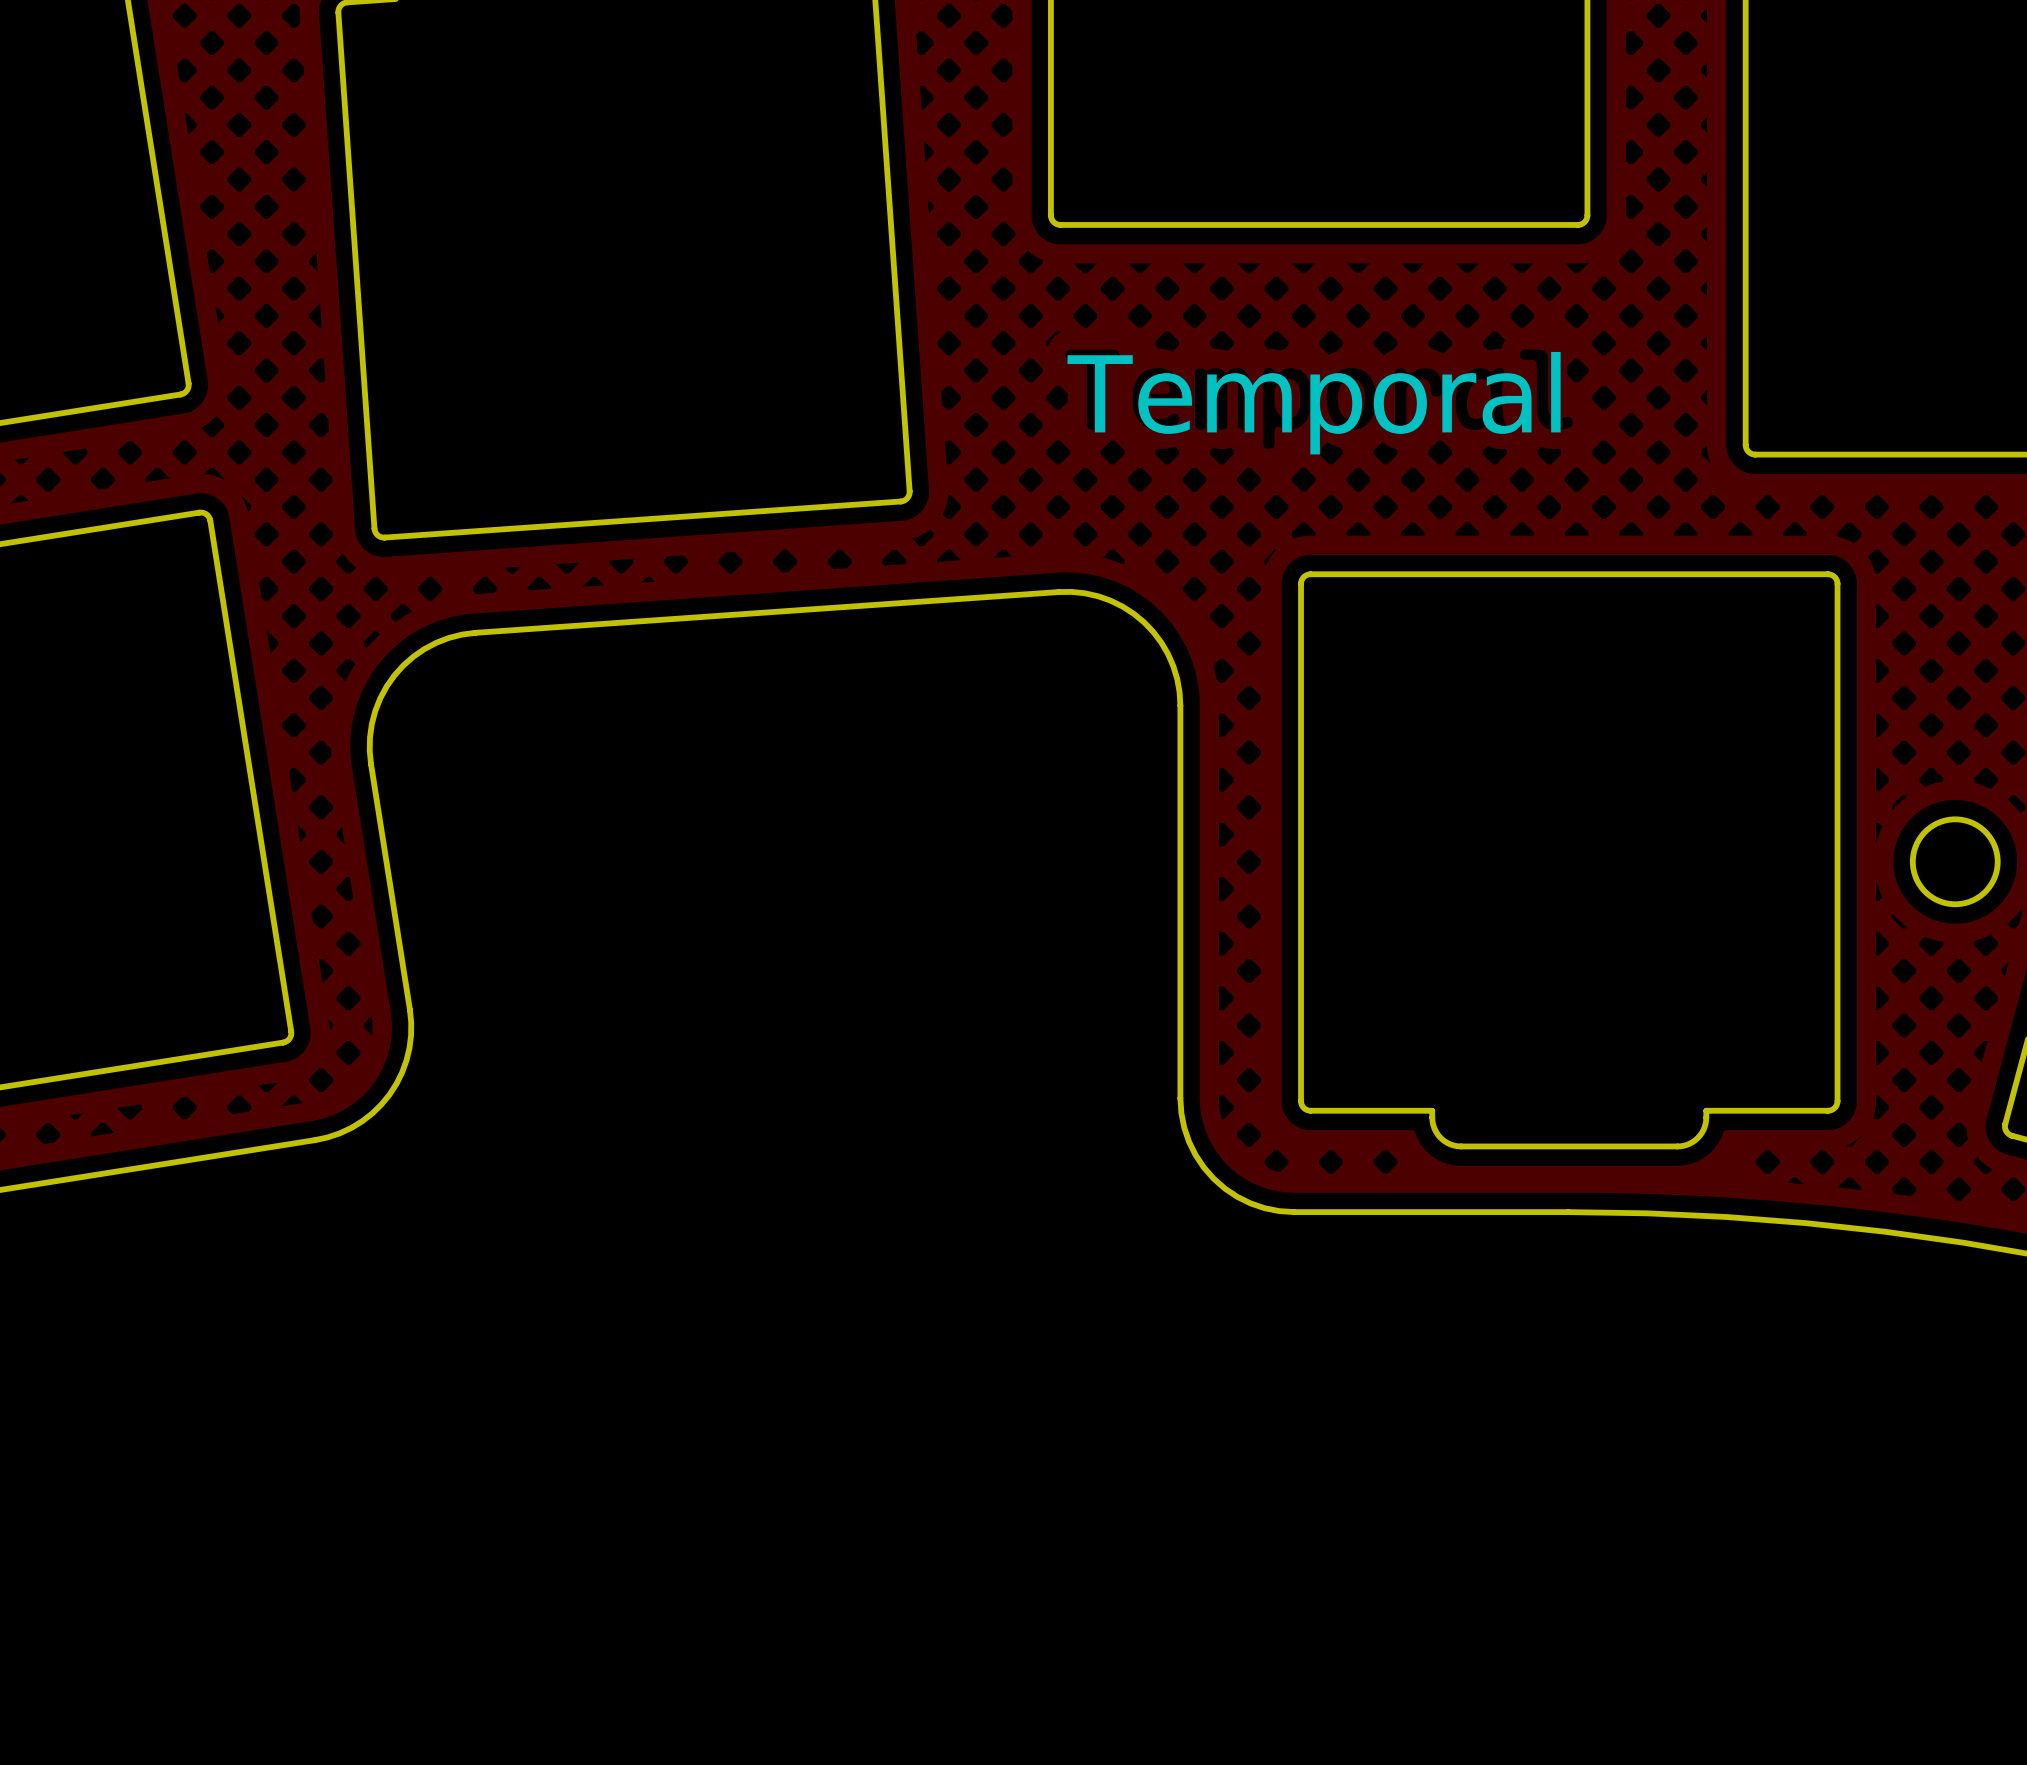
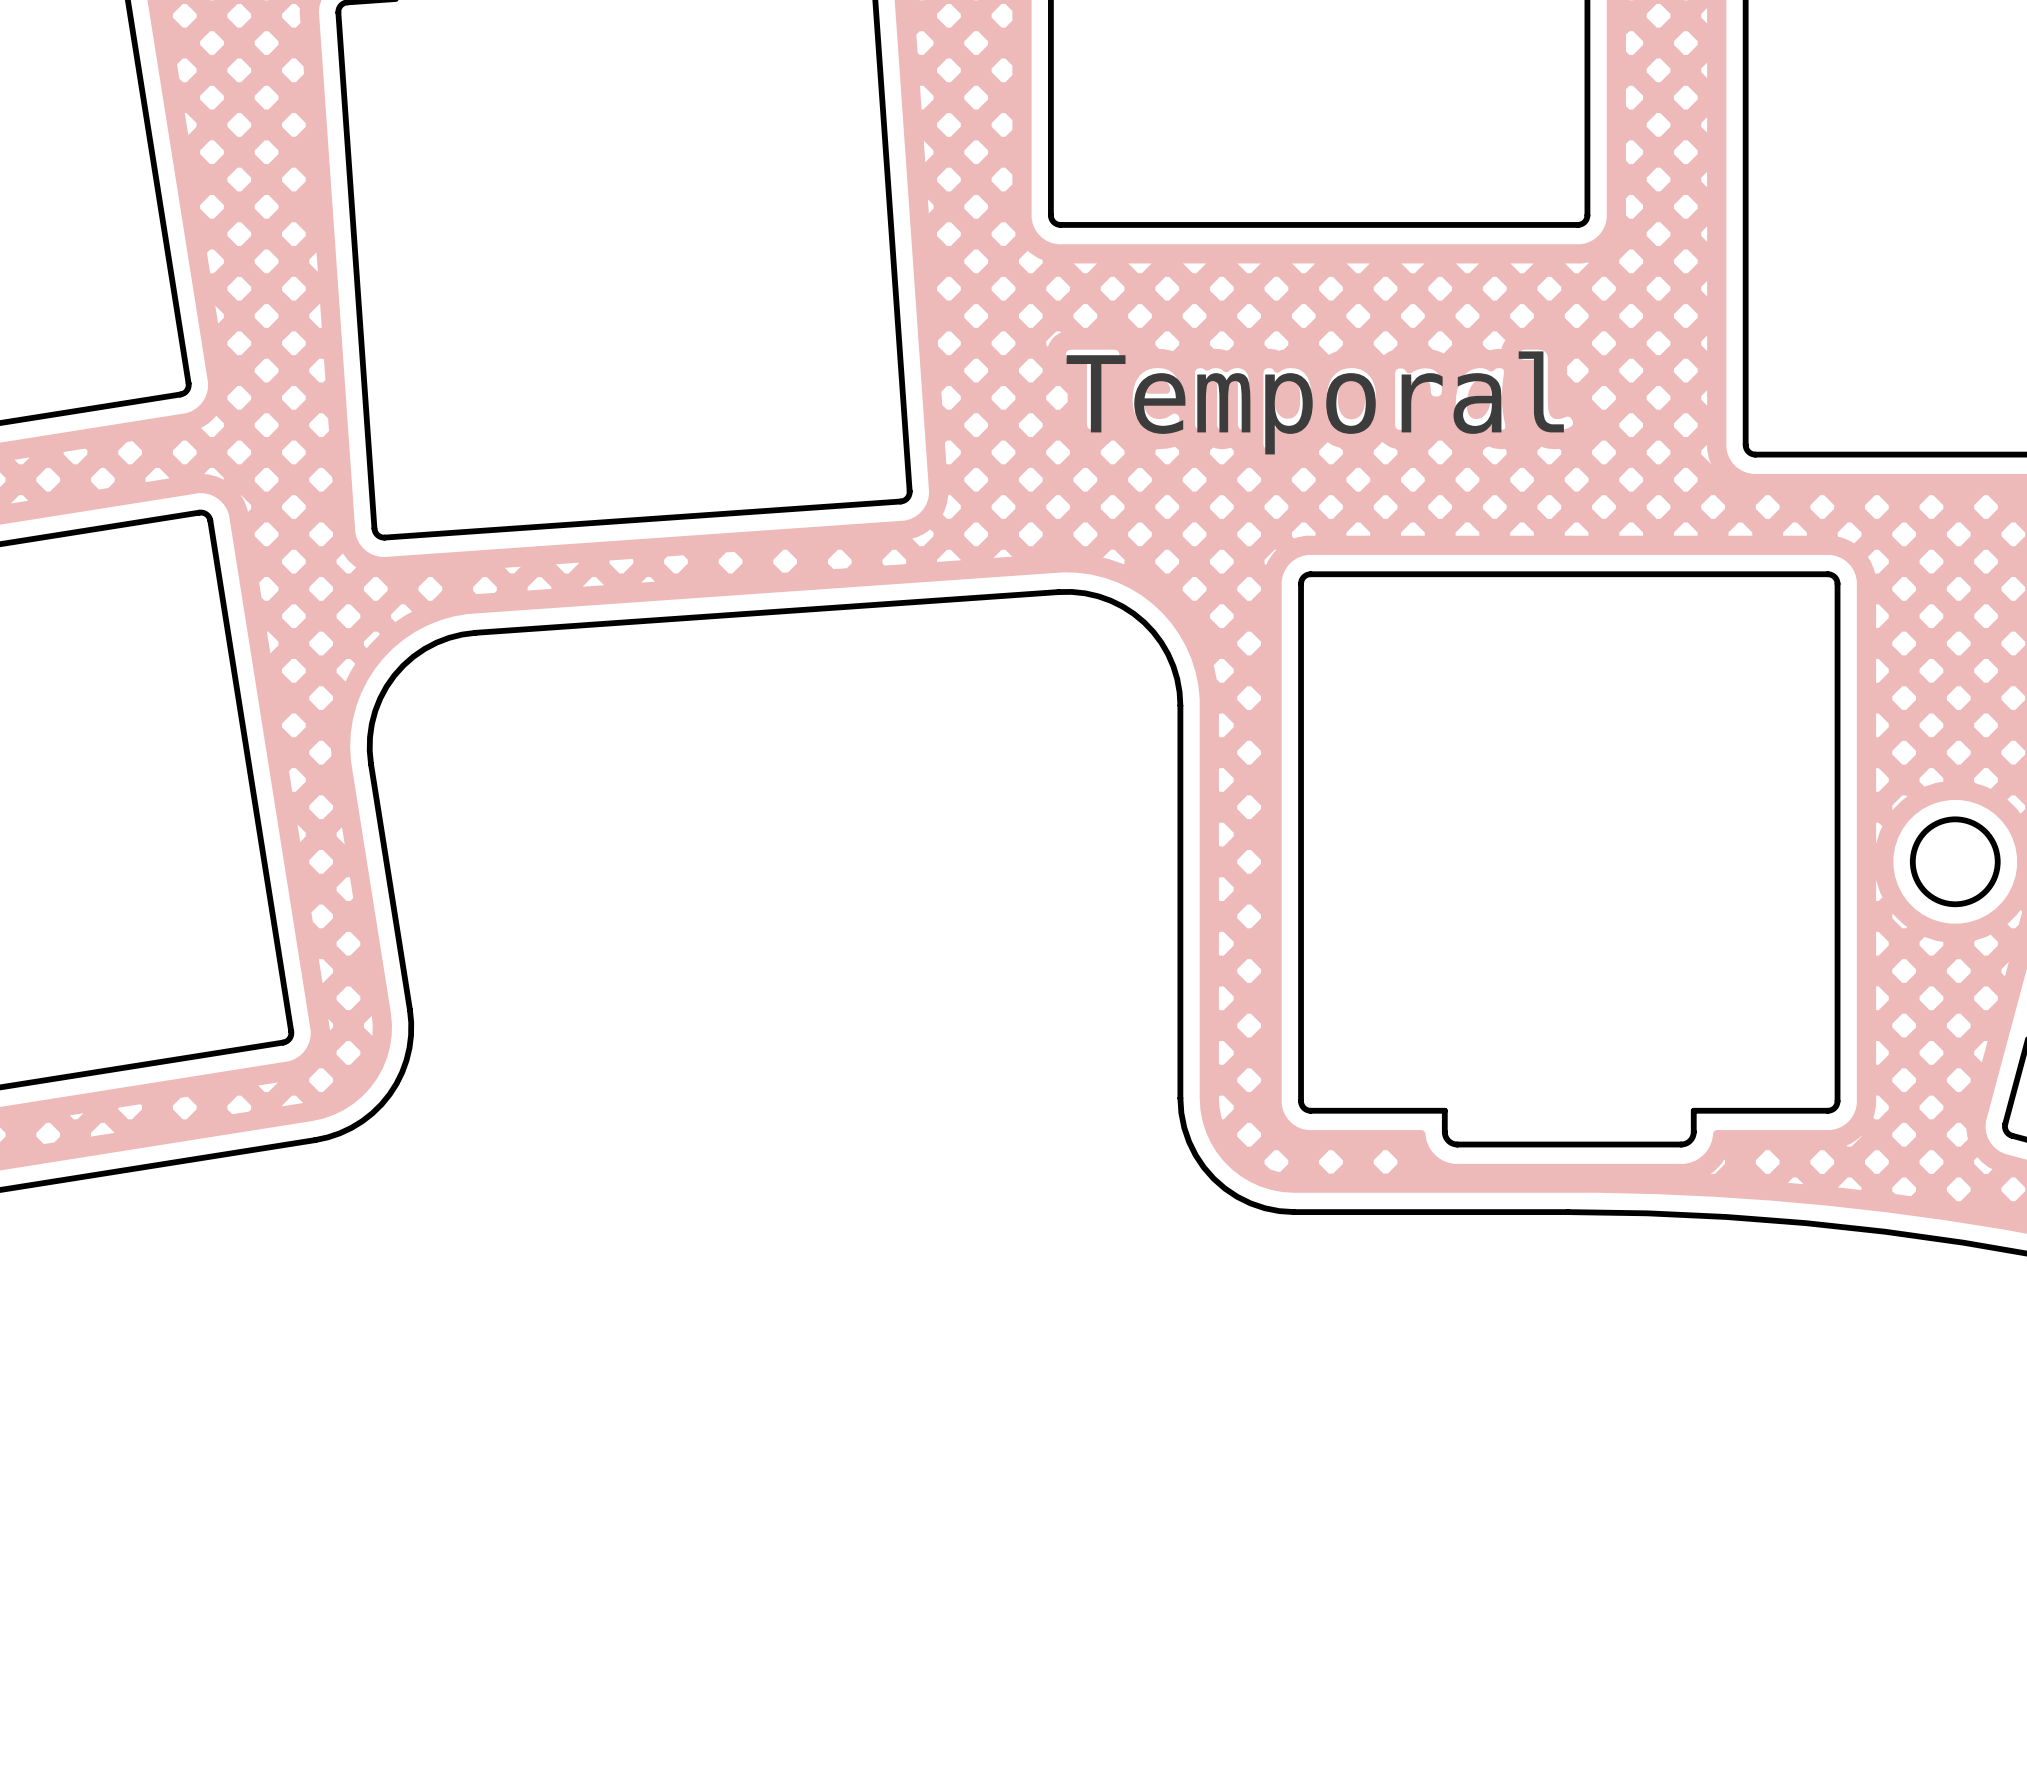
board edge: (1432, 1110) (1433, 1125) (1438, 1135) (1450, 1144) (1461, 1146) (1680, 1146) (1689, 1143) (1699, 1135) (1705, 1123) (1706, 1110) -> (1432, 1110) (1444, 1110) (1445, 1136) (1449, 1141) (1457, 1144) (1682, 1144) (1689, 1141) (1693, 1136) (1693, 1110) (1706, 1110)

